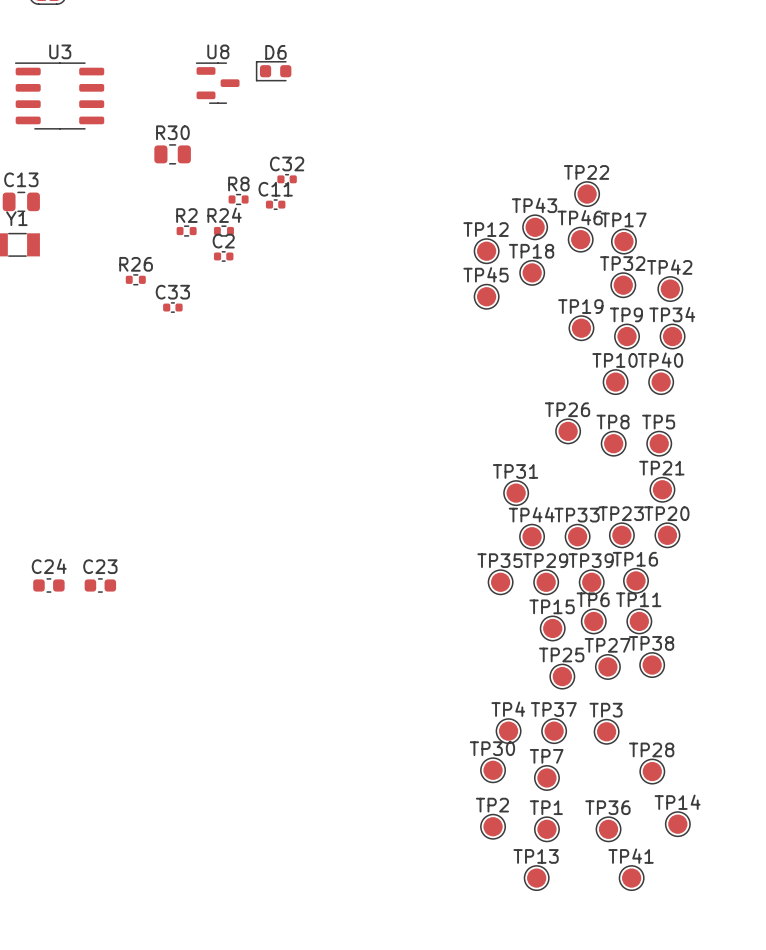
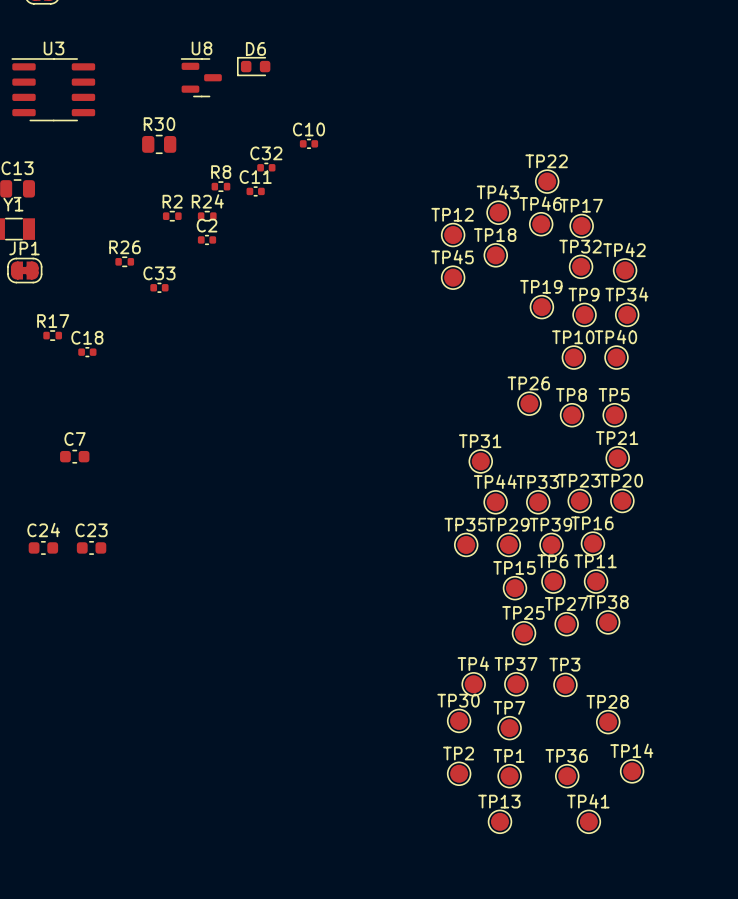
C10: none -> (308, 143)
JP1: none -> (24, 270)
R17: none -> (52, 335)
C18: none -> (87, 352)
C7: none -> (74, 456)

